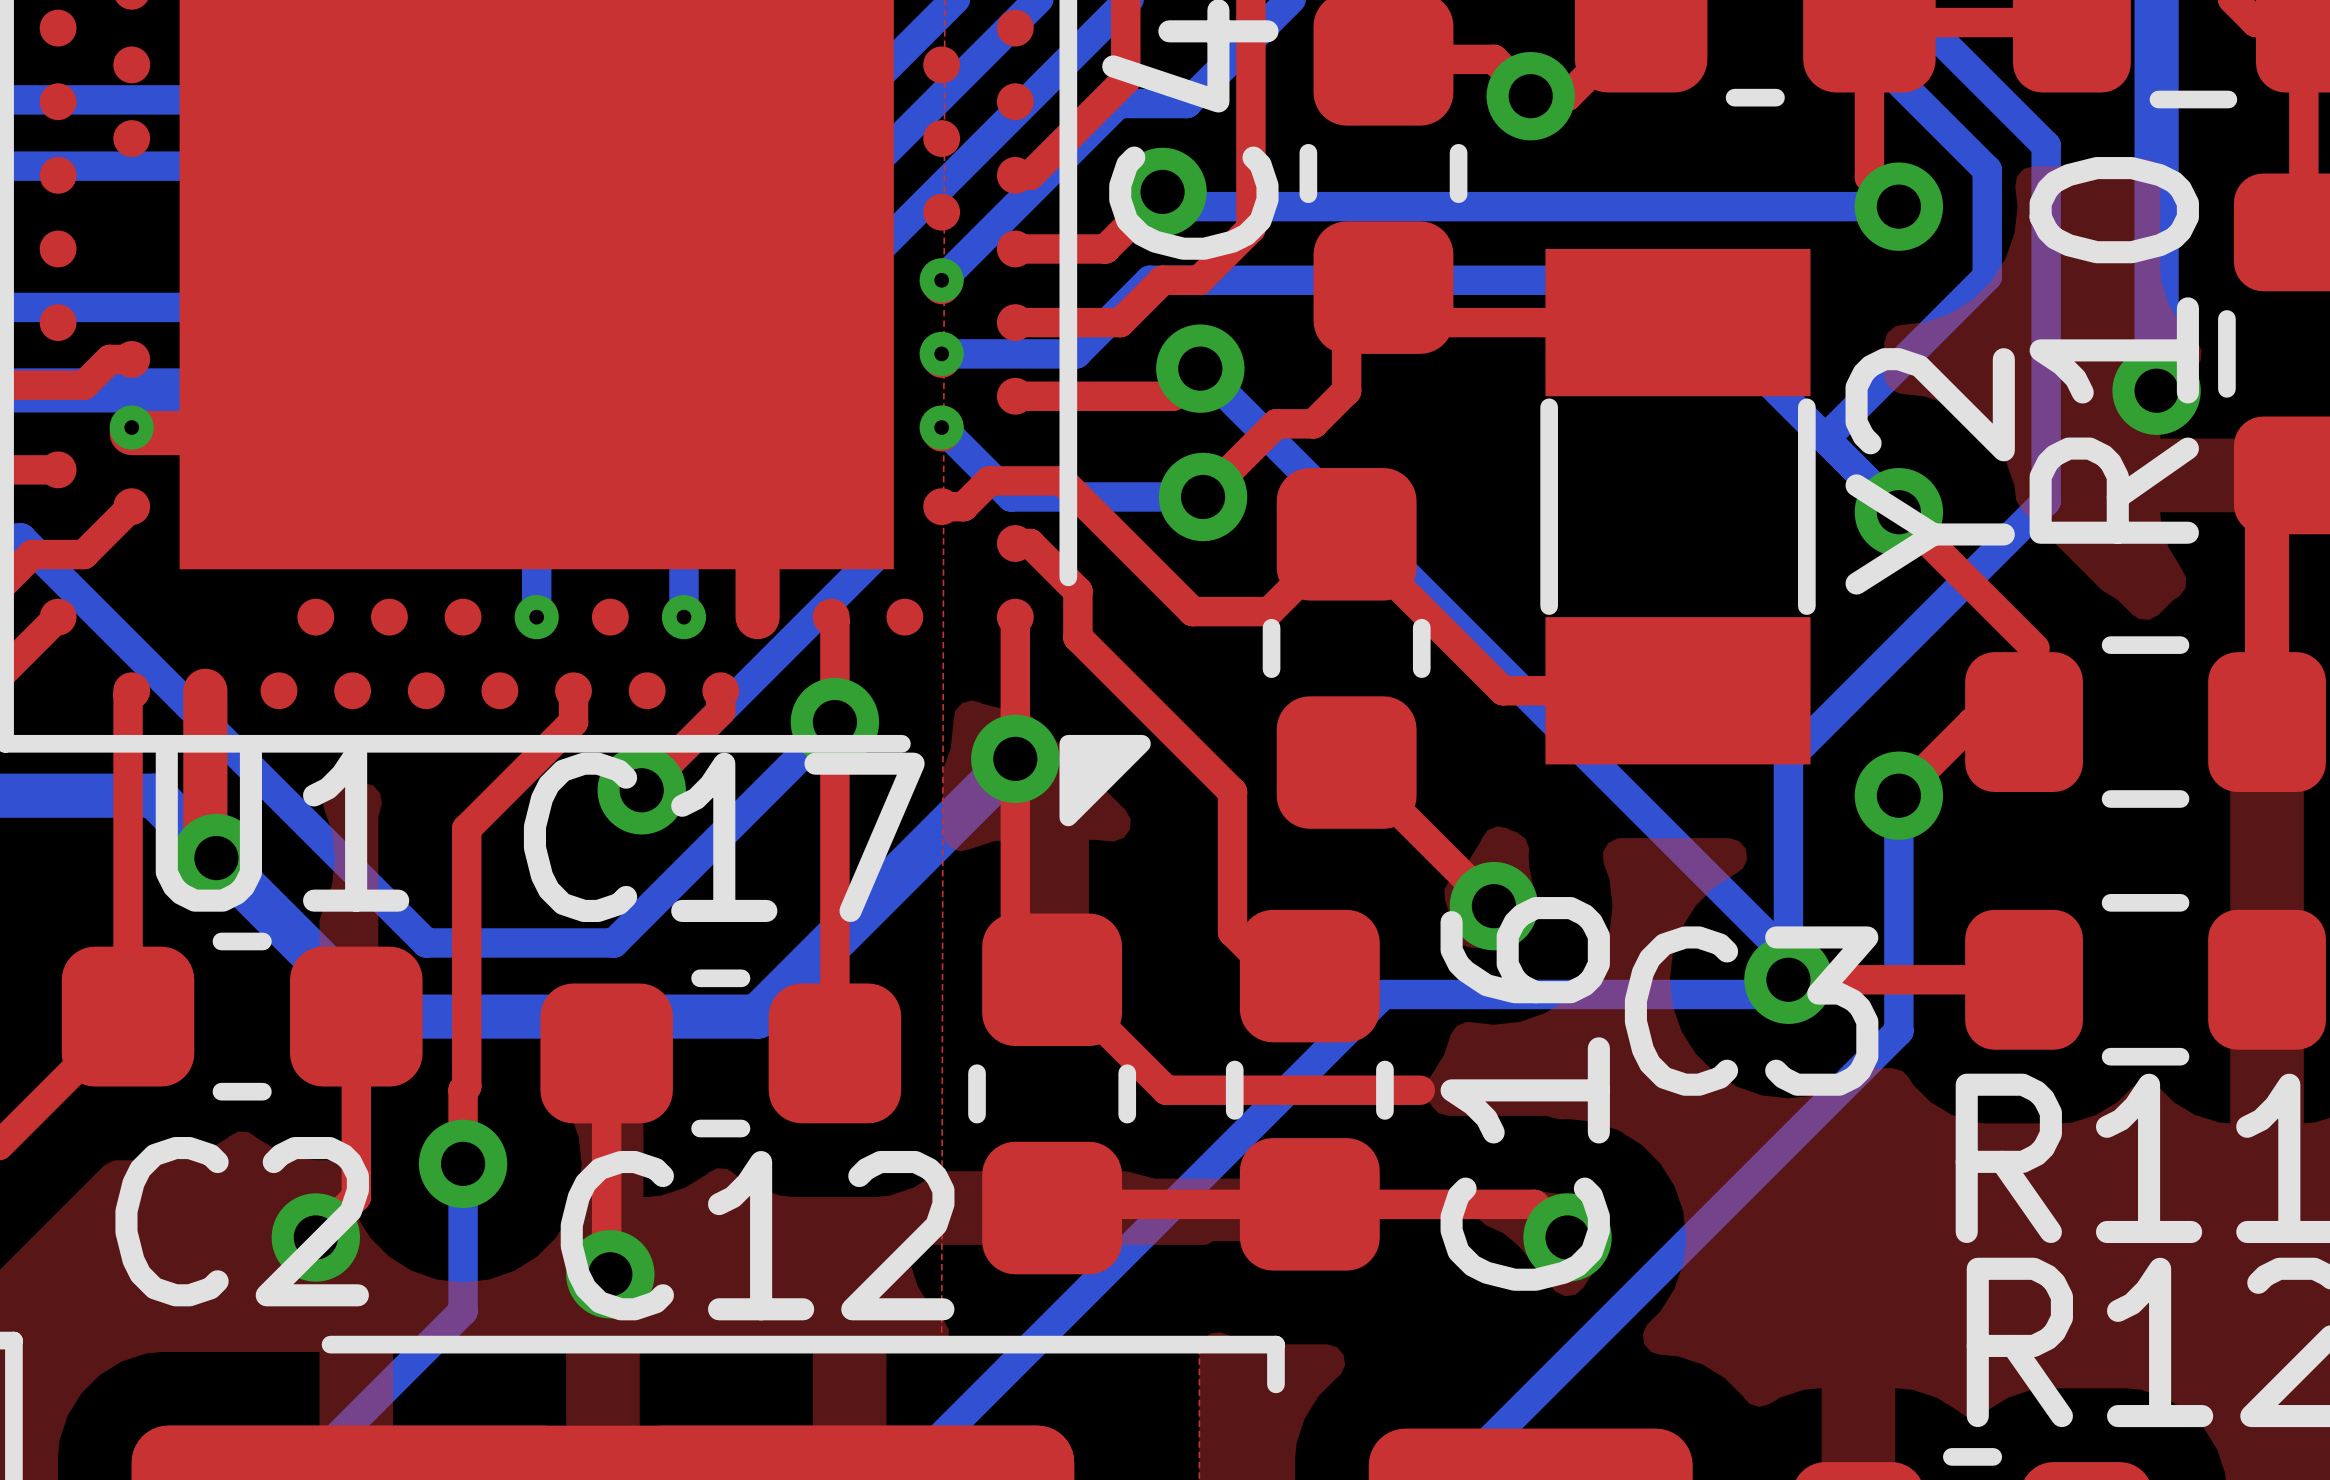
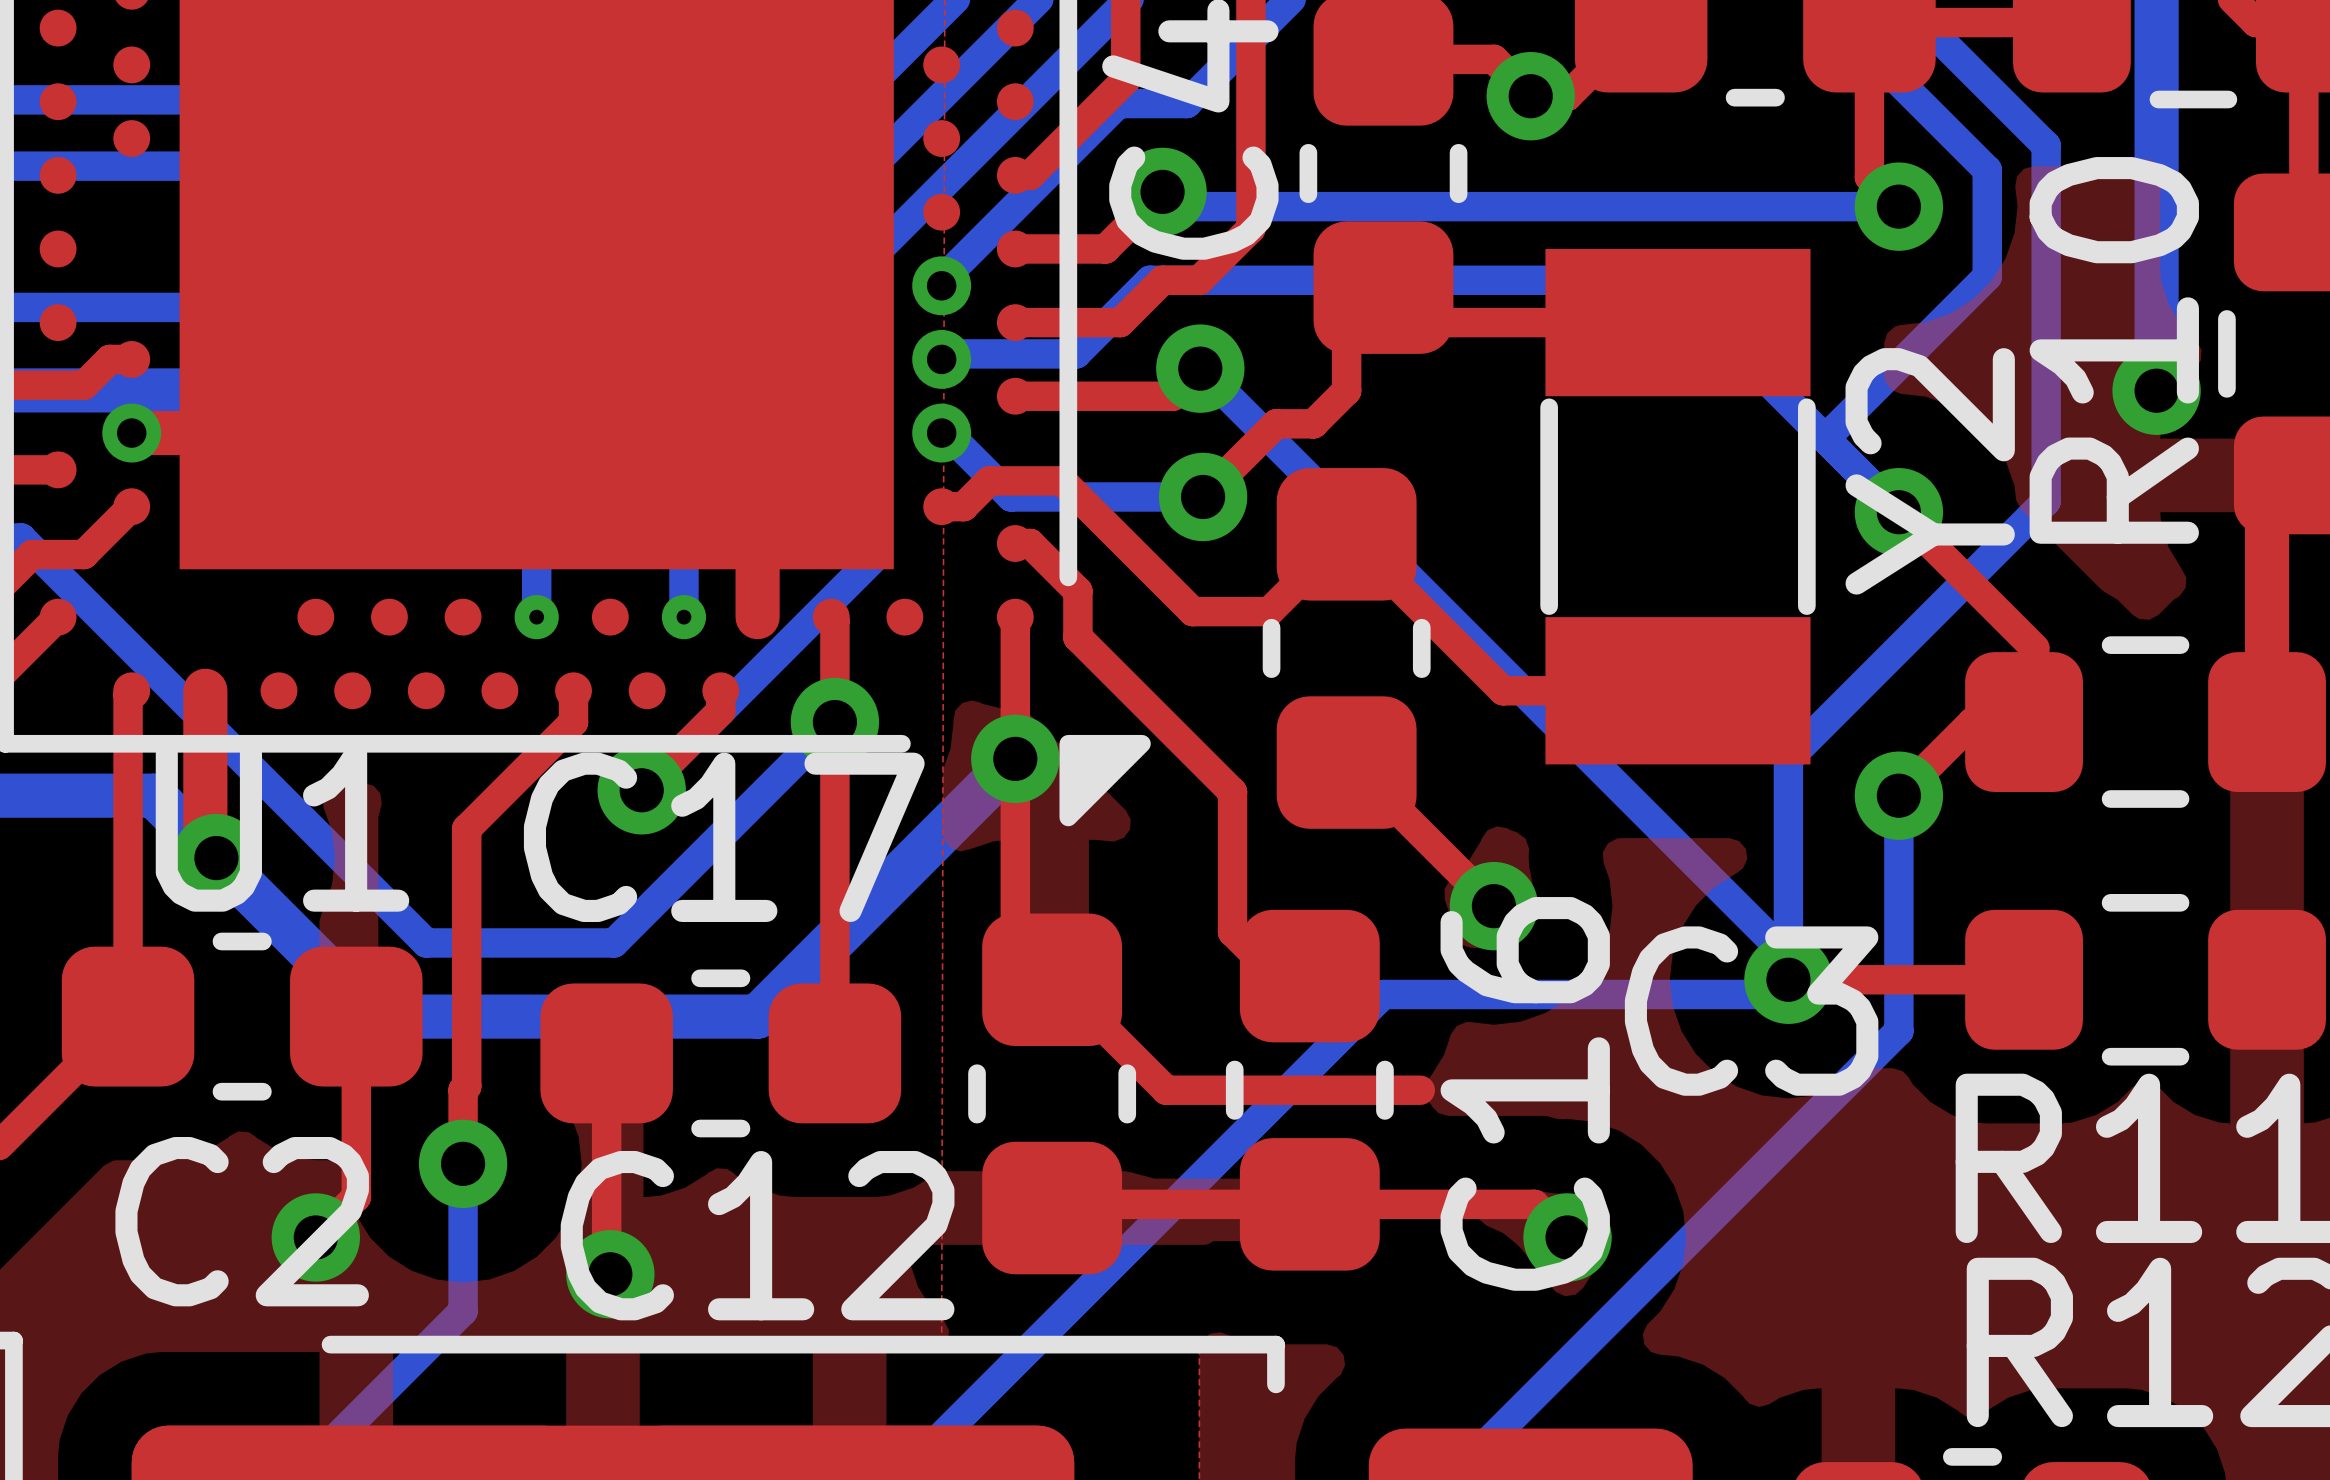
via size: [919, 258, 964, 303] -> [912, 256, 972, 316]
via size: [919, 331, 964, 376] -> [912, 329, 972, 389]
via size: [109, 405, 154, 450] -> [102, 403, 162, 463]
via size: [919, 405, 964, 450] -> [912, 403, 972, 463]

